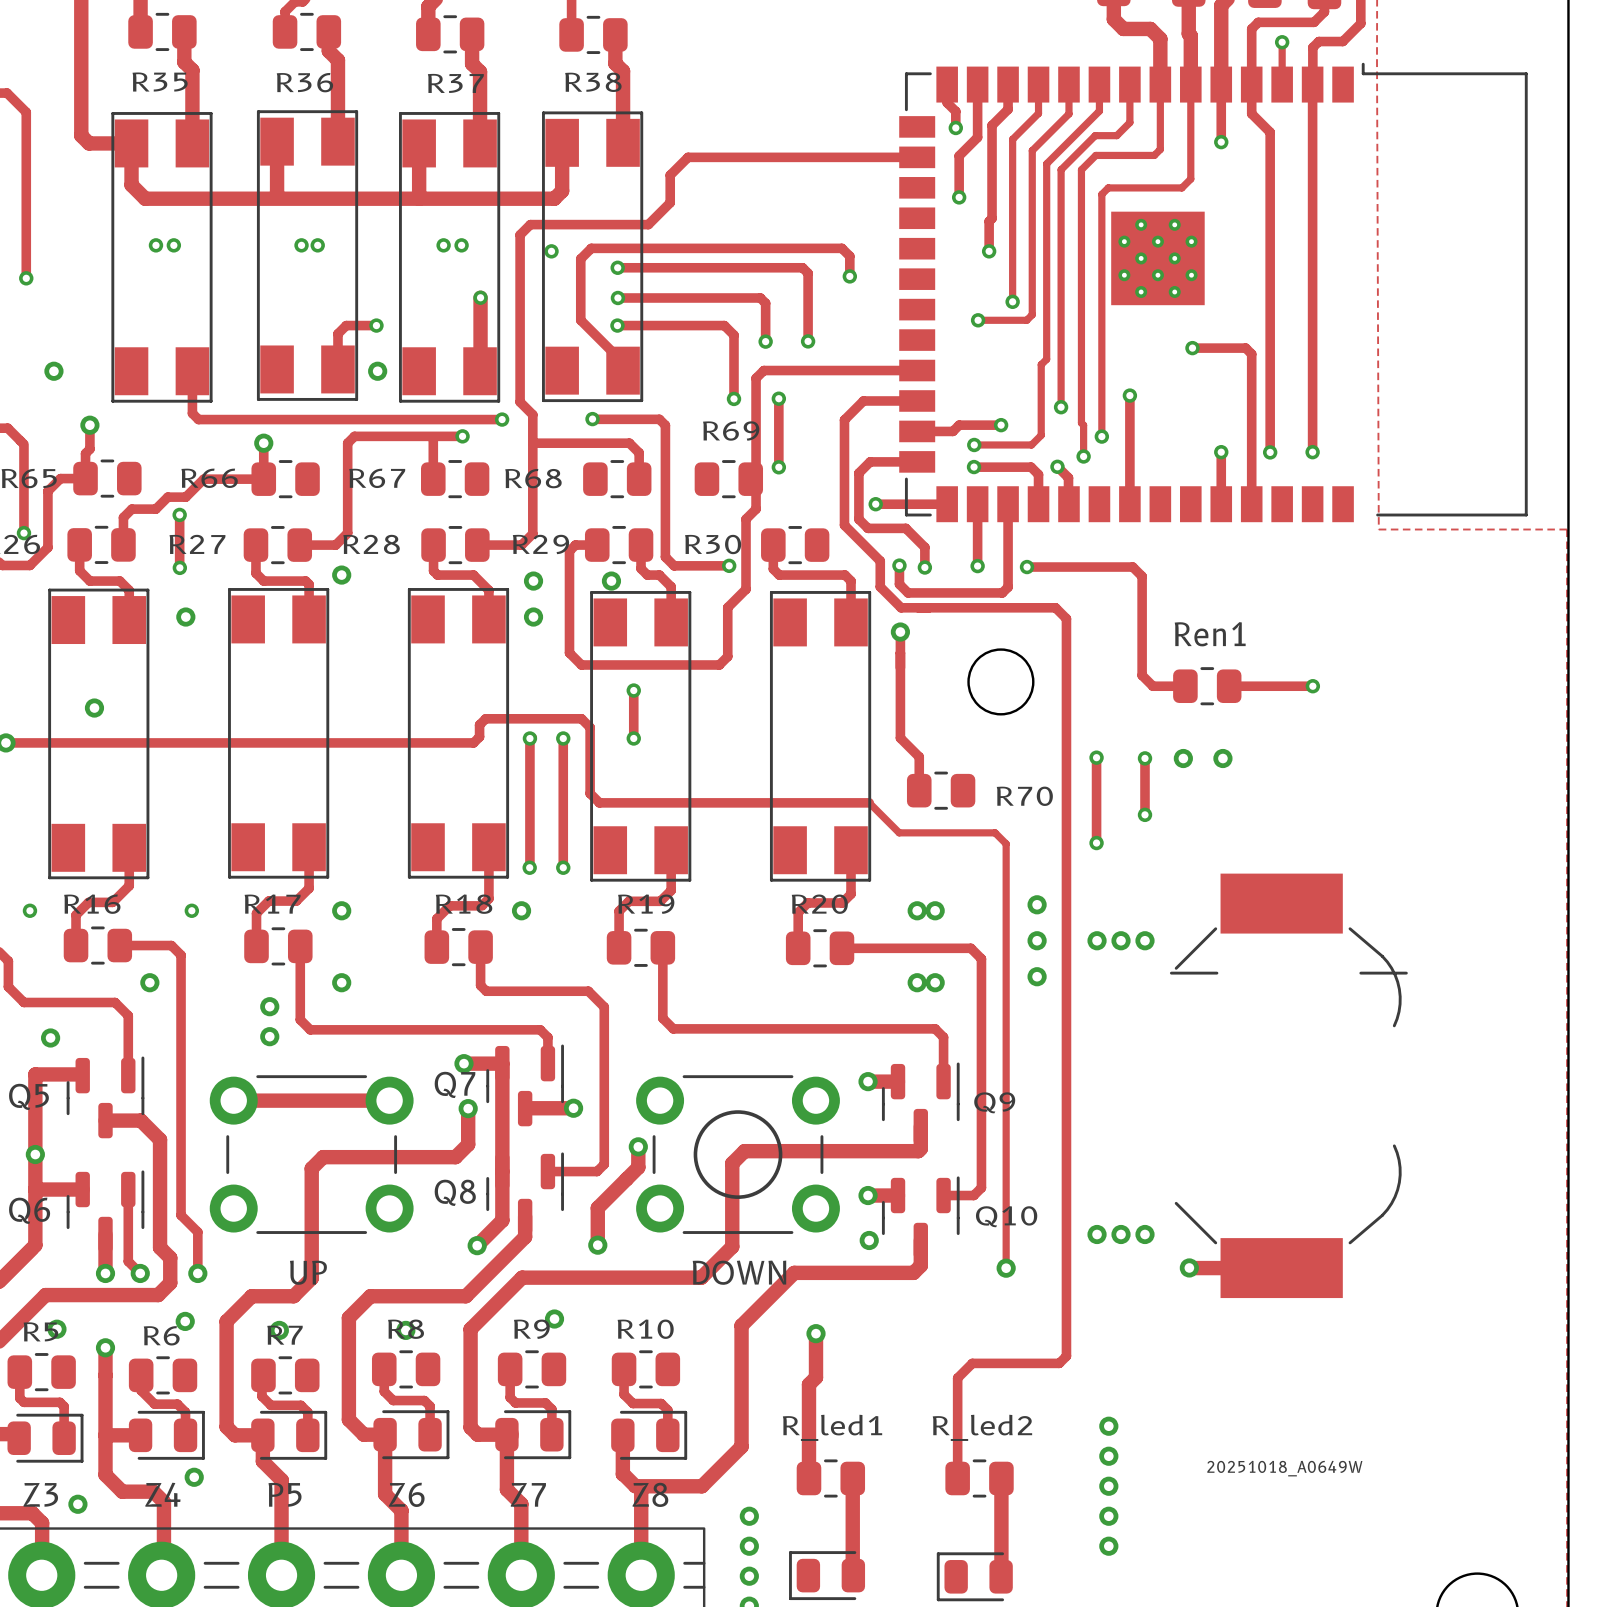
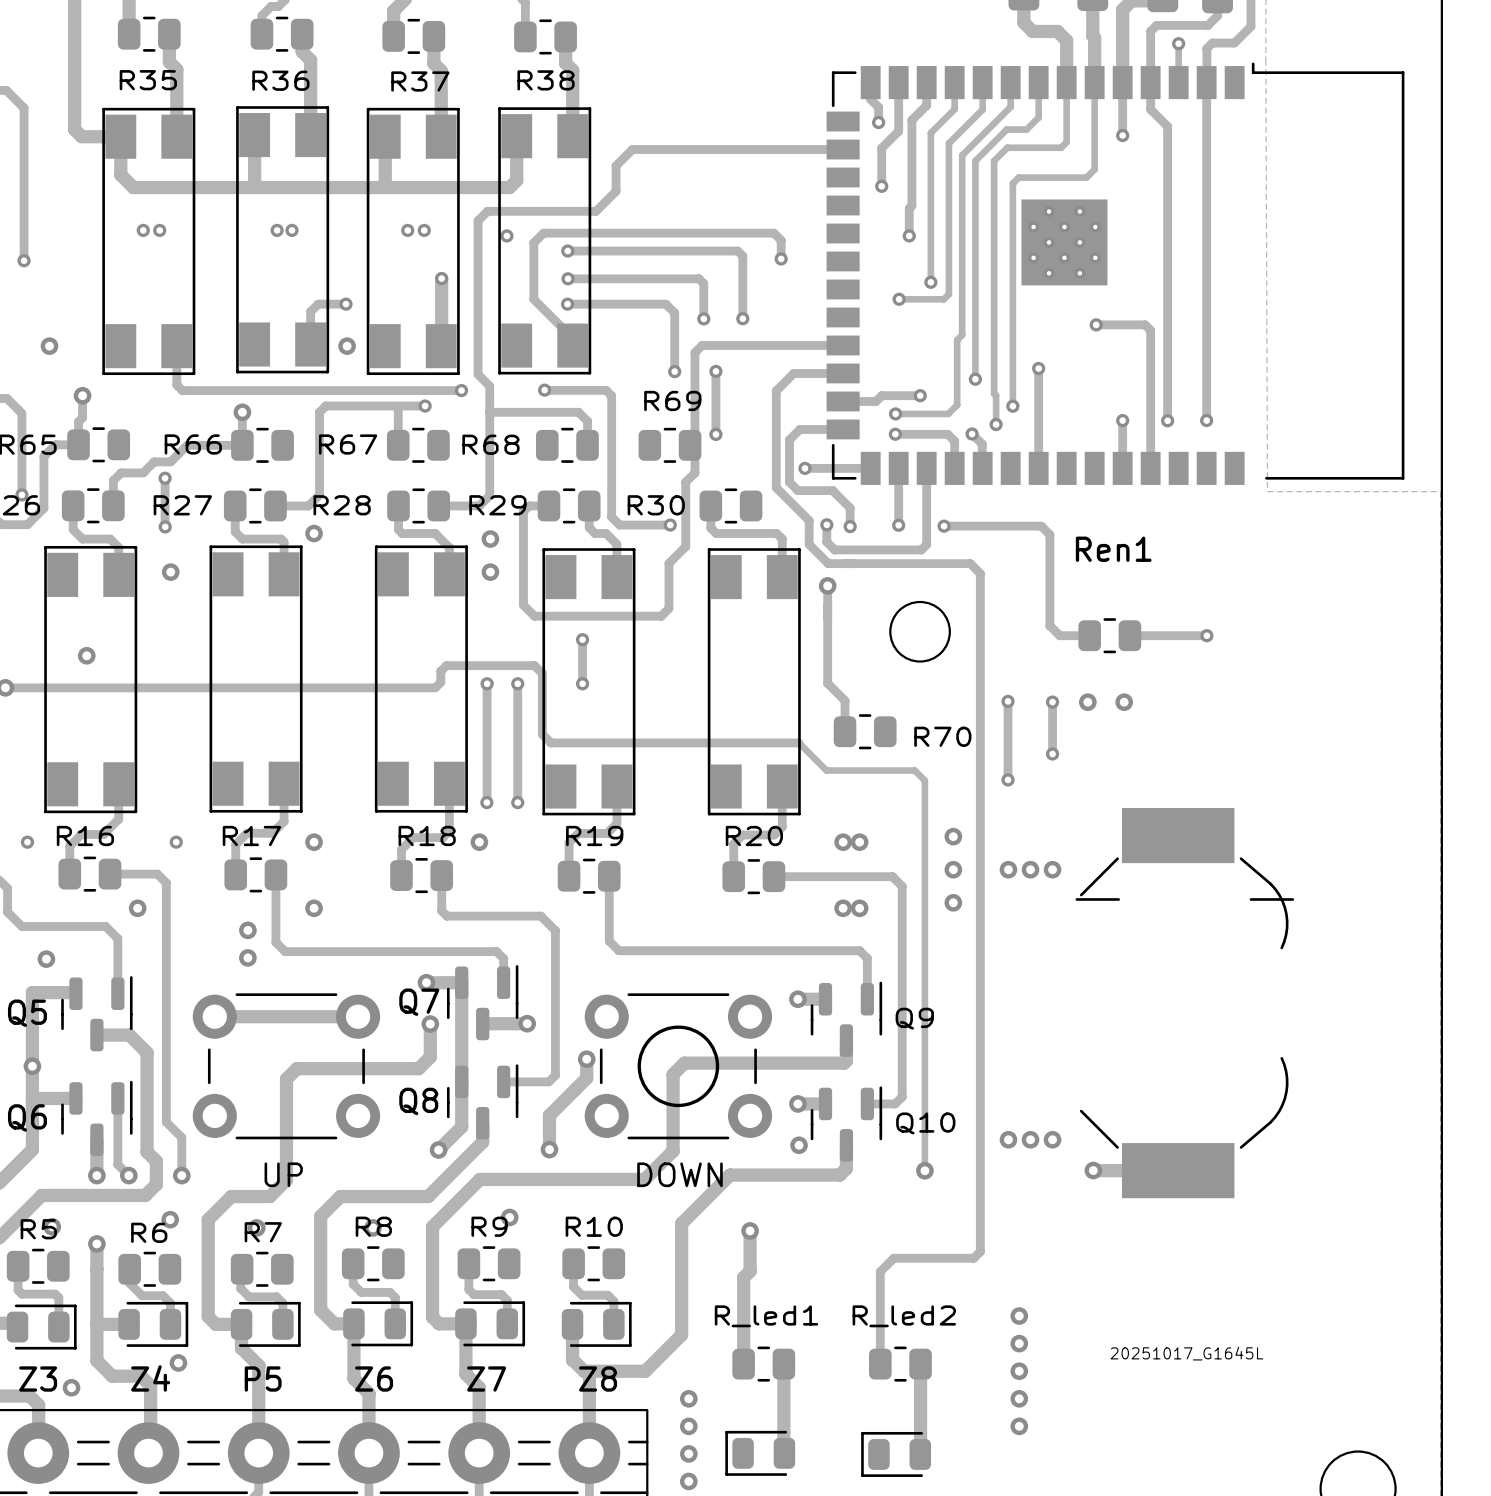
via: (611, 581) -> none
Ren1 name position: Ren1 (1210, 634) -> Ren1 (1113, 549)
text: 20251018_A0649W (1284, 1468) -> 20251017_G1645L (1186, 1353)

